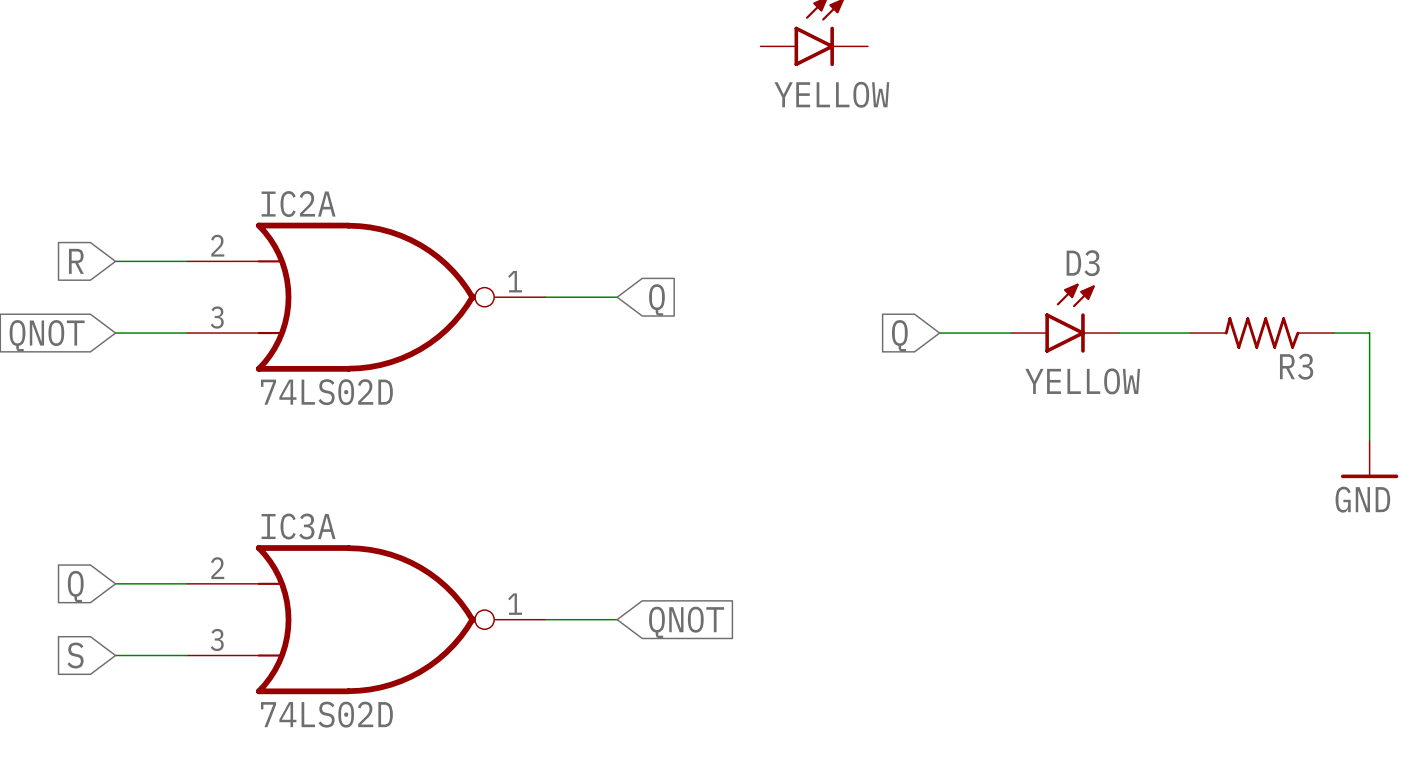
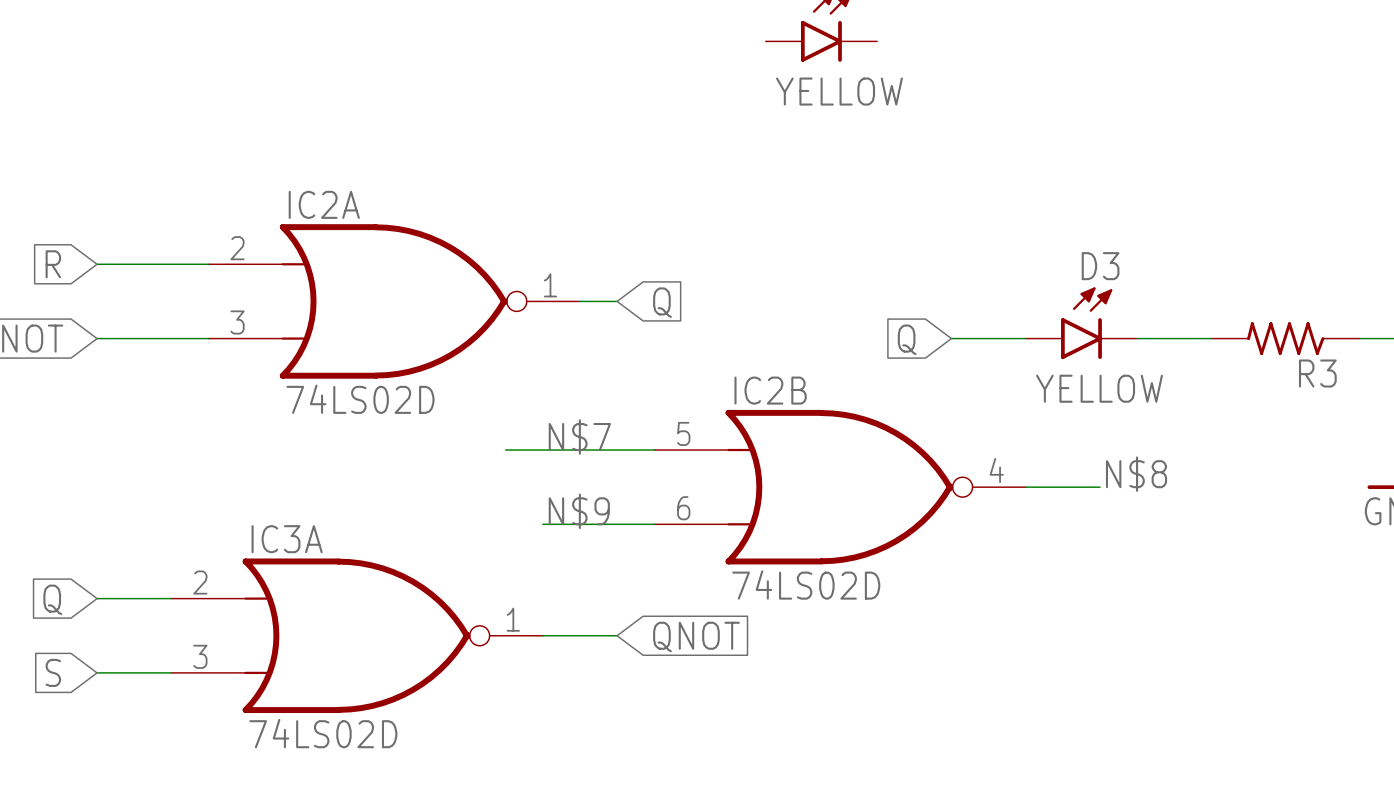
IC2A position: (366, 297) -> (394, 301)
label: none -> N$7 (579, 437)
wire: none -> (505, 450) (654, 450)
label: none -> N$8 (1136, 474)
IC2B: none -> 74LS02D (840, 487)
wire: none -> (1025, 487) (1100, 487)
label: none -> N$9 (579, 511)
wire: none -> (542, 524) (654, 524)

